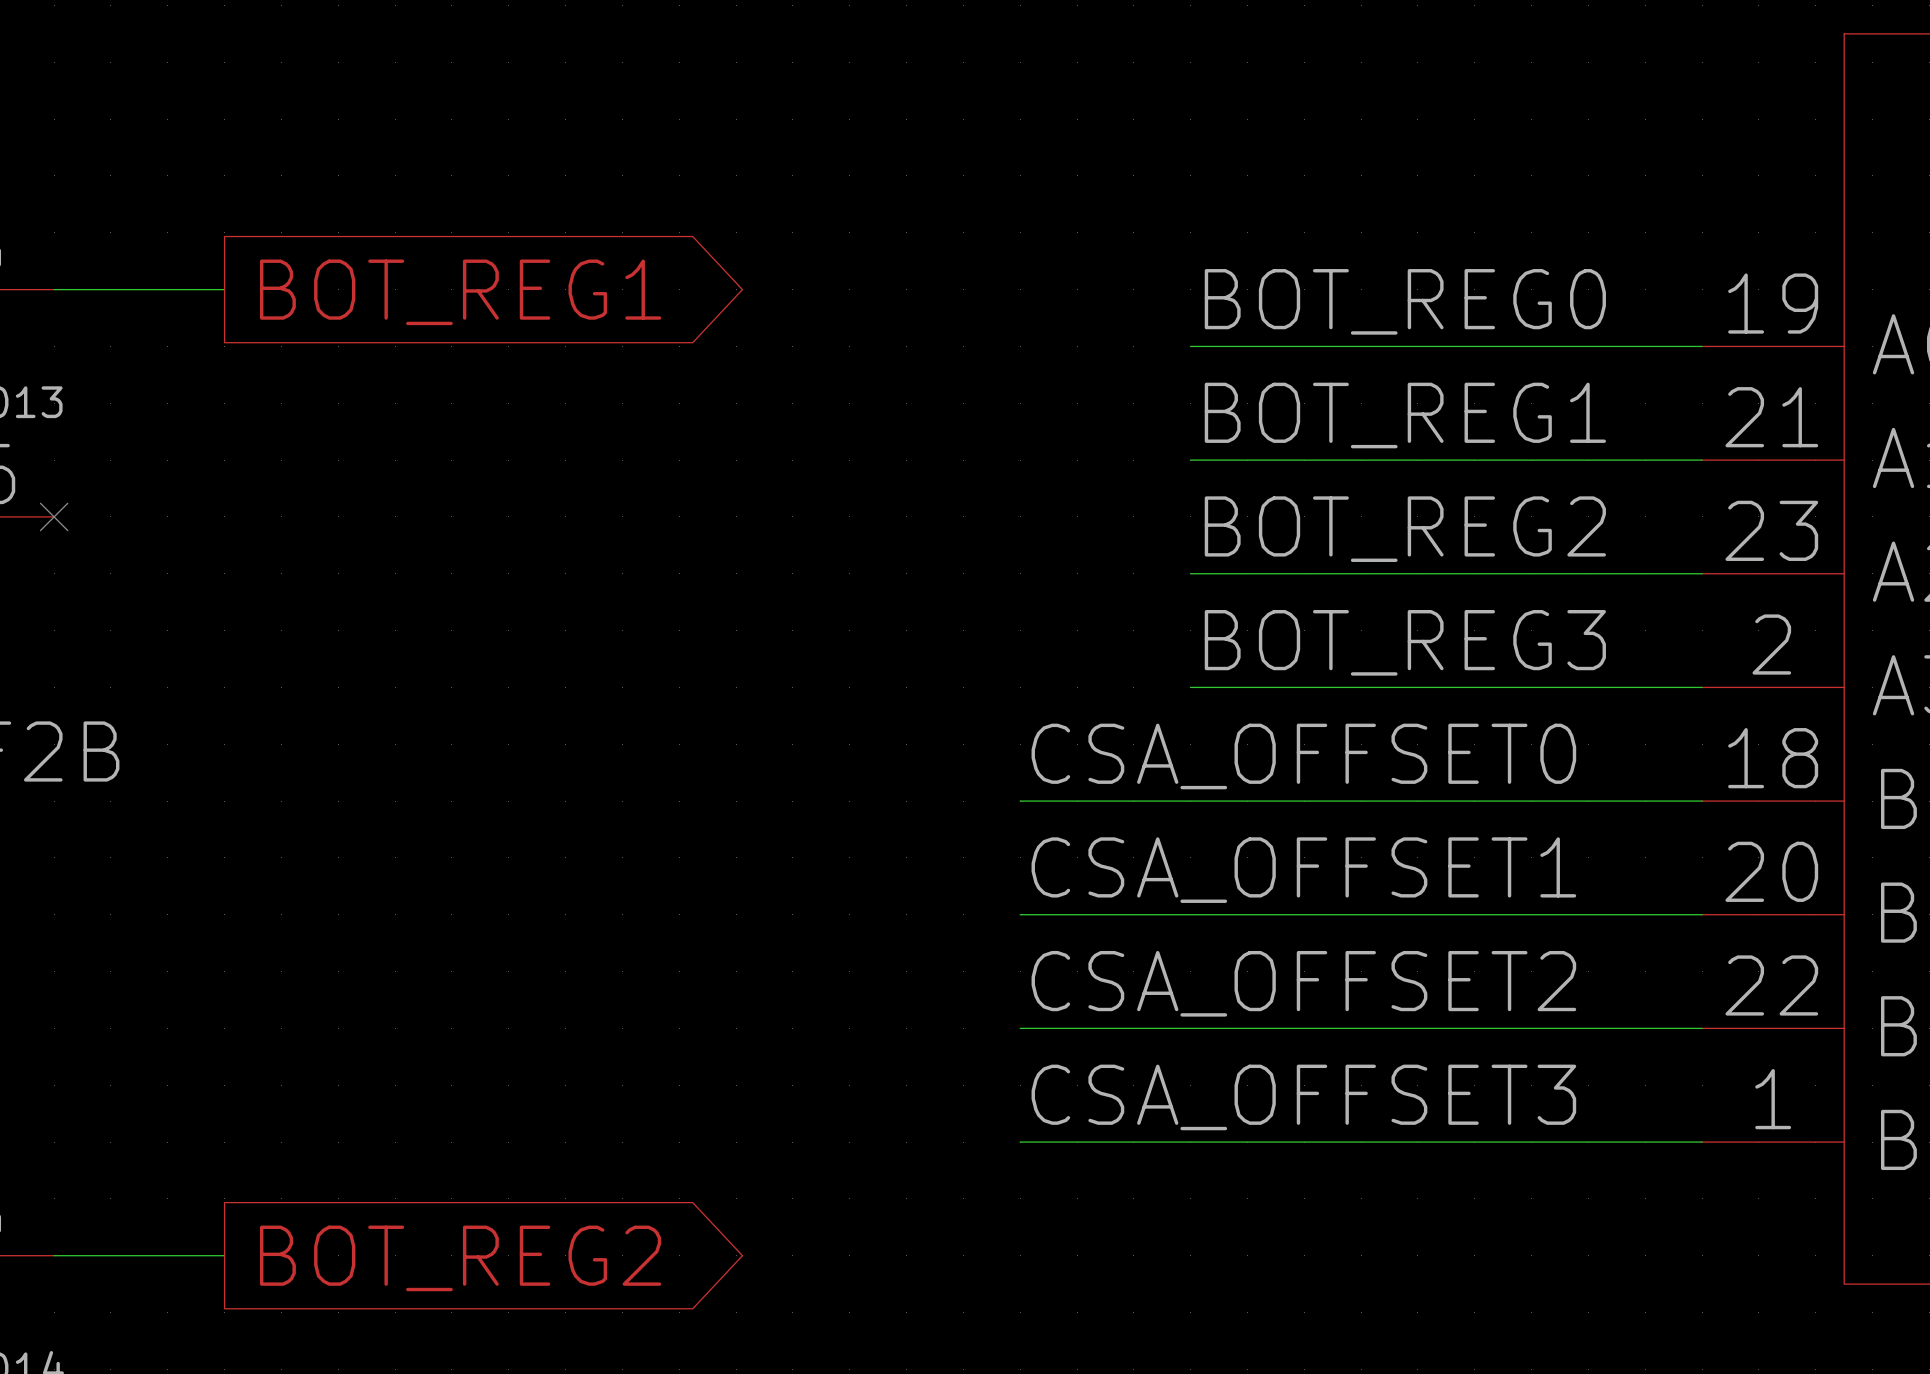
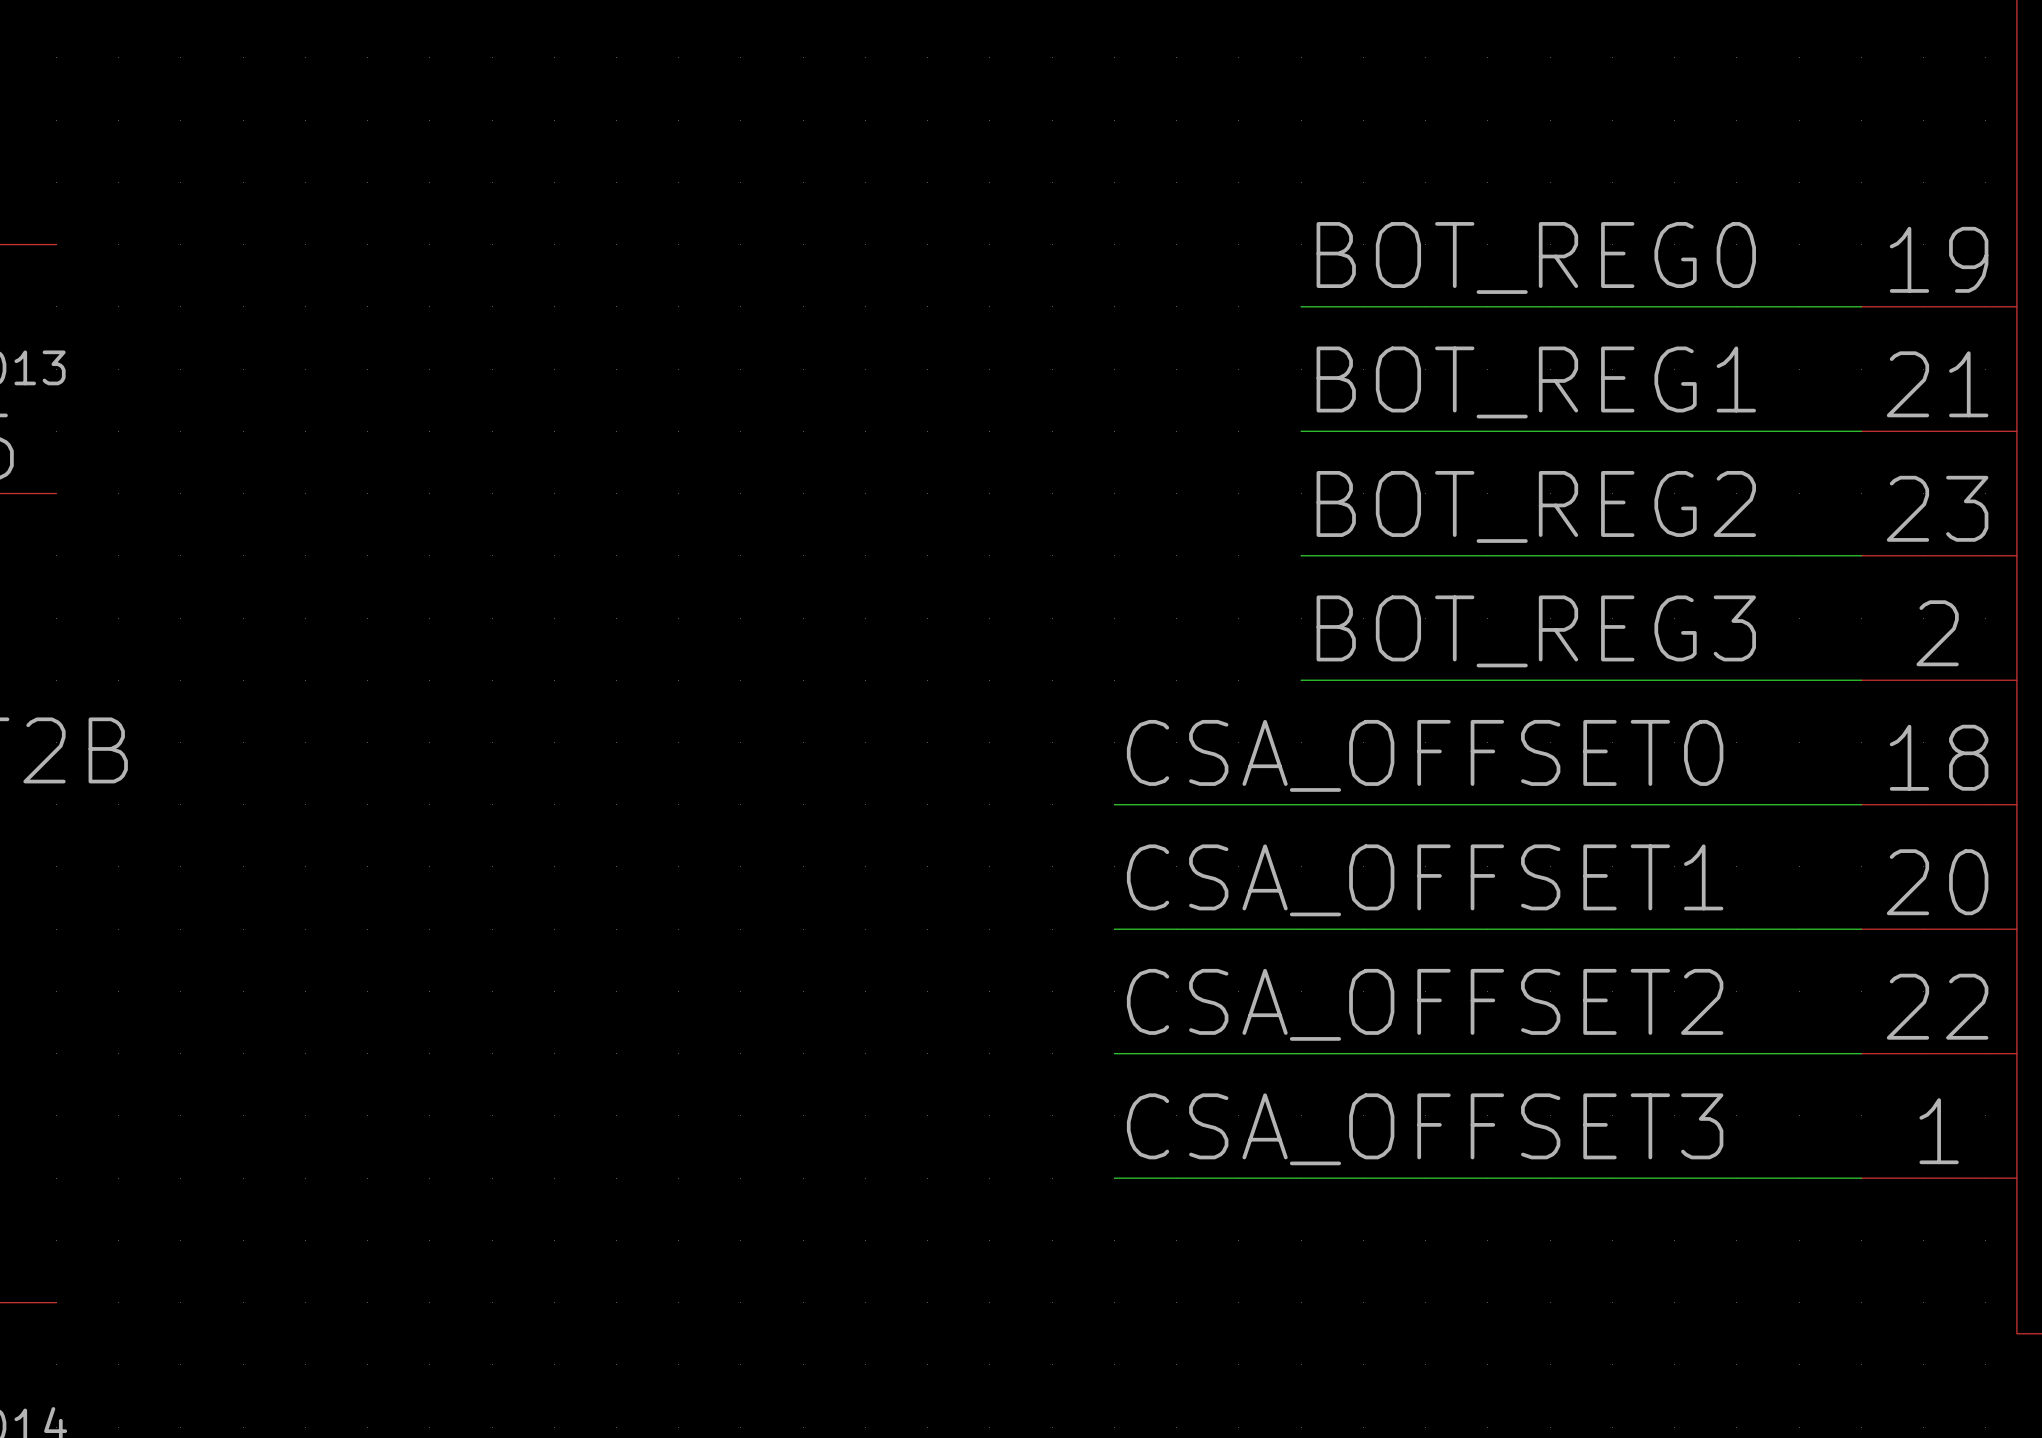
wire: (54, 289) (224, 289) -> none
global label: BOT_REG1 (460, 292) -> none
no-connect mark: (54, 516) -> none
wire: (54, 1255) (224, 1255) -> none
global label: BOT_REG2 (460, 1258) -> none

